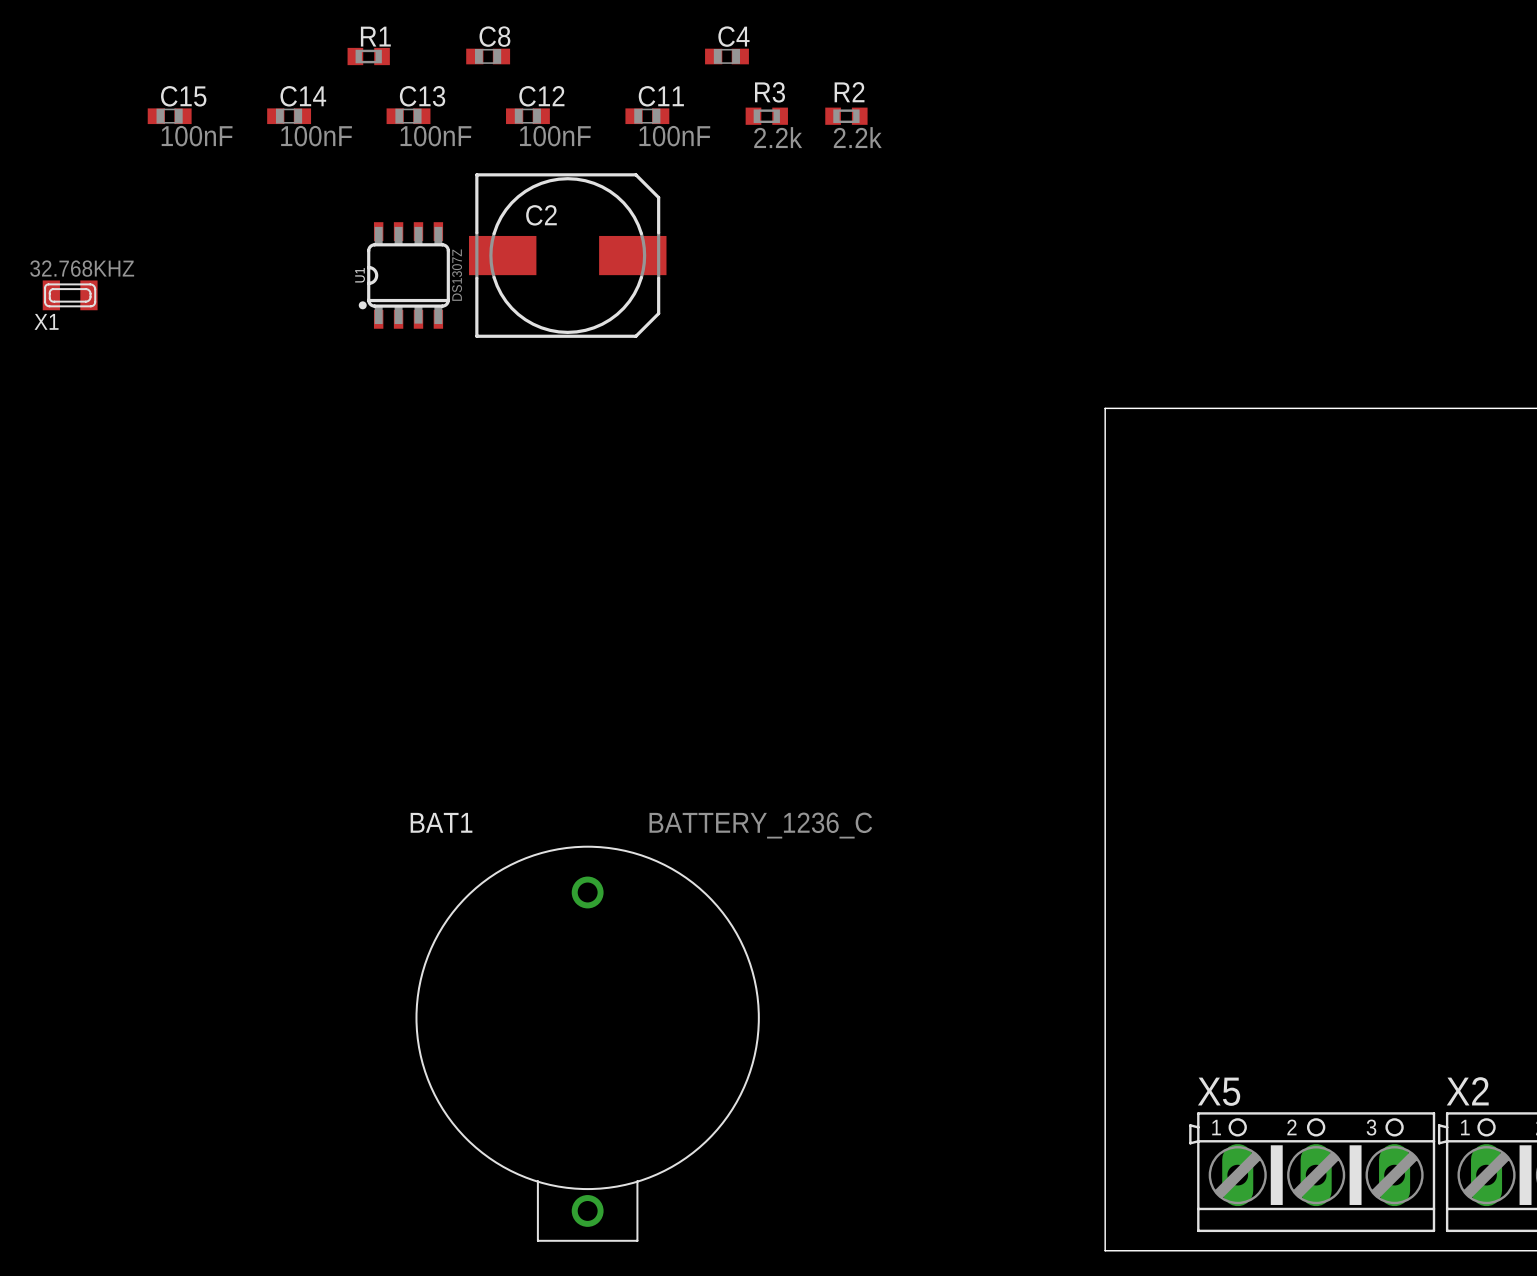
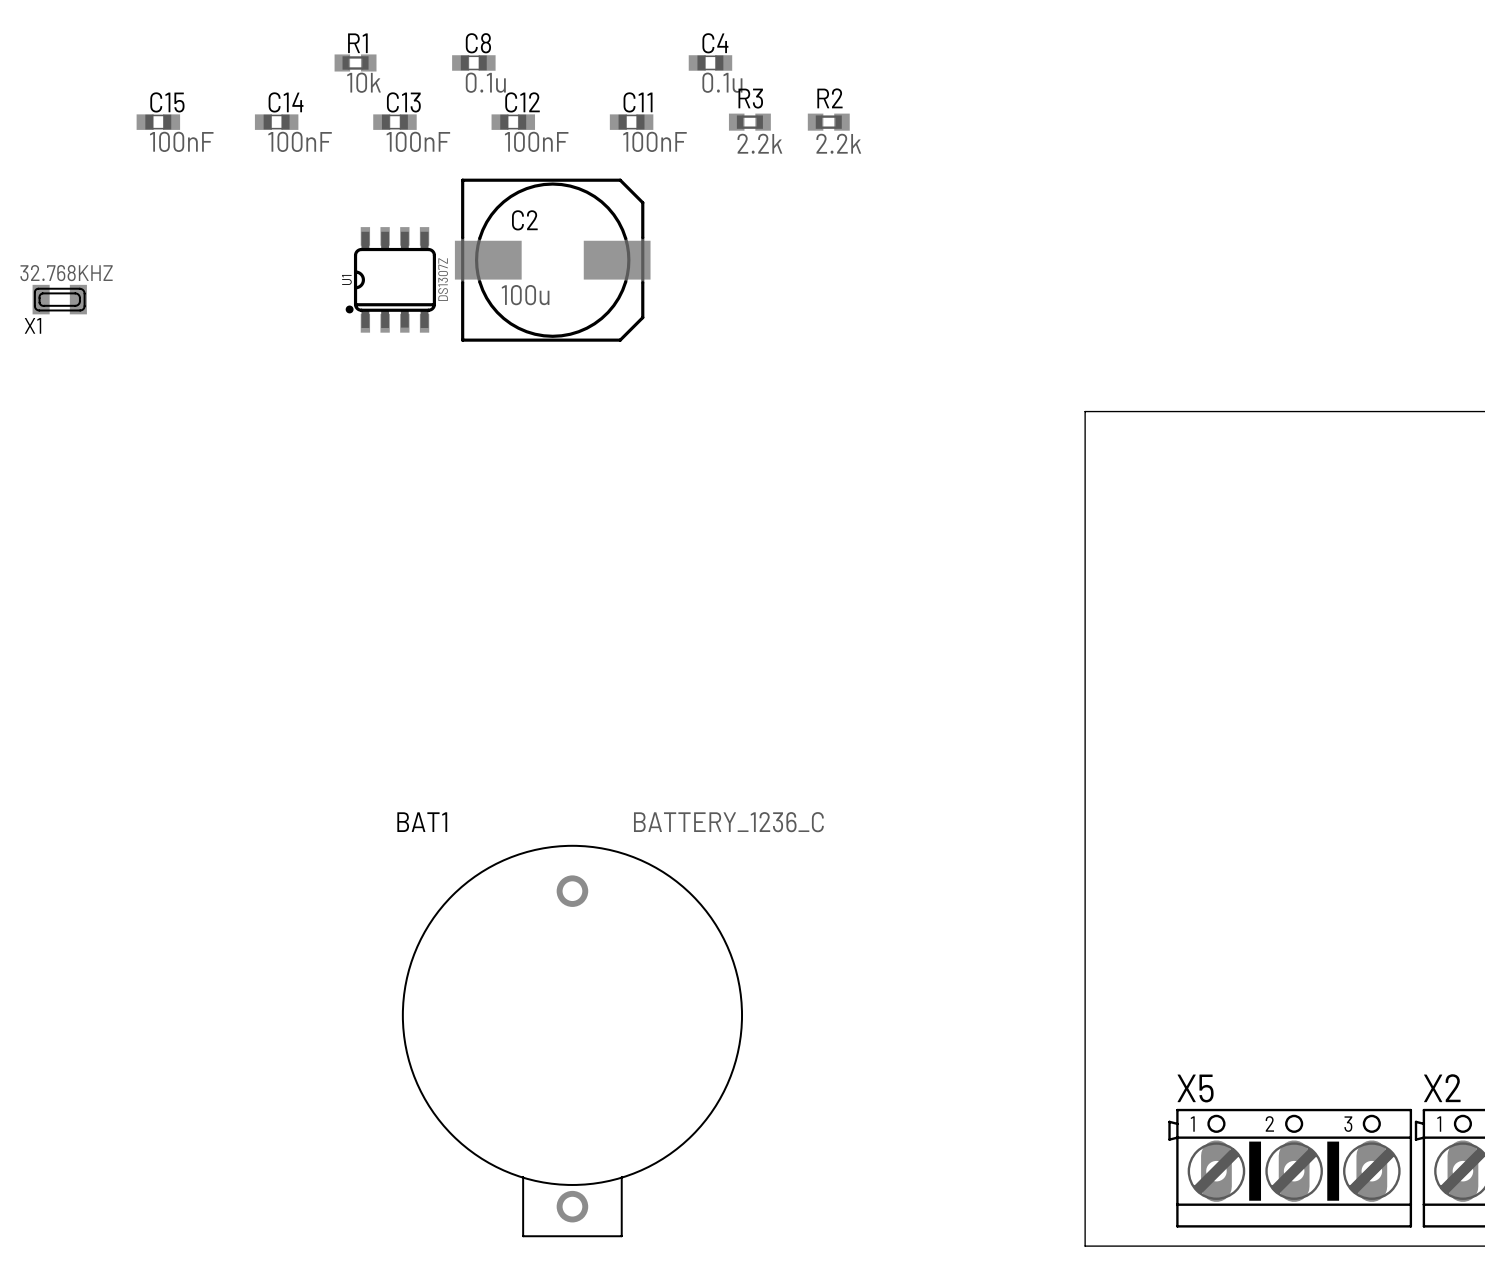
R1 value: none -> 10k (363, 82)
C8 value: none -> 0.1u (485, 82)
C4 value: none -> 0.1u (722, 82)
C2 value: none -> 100u (525, 295)

